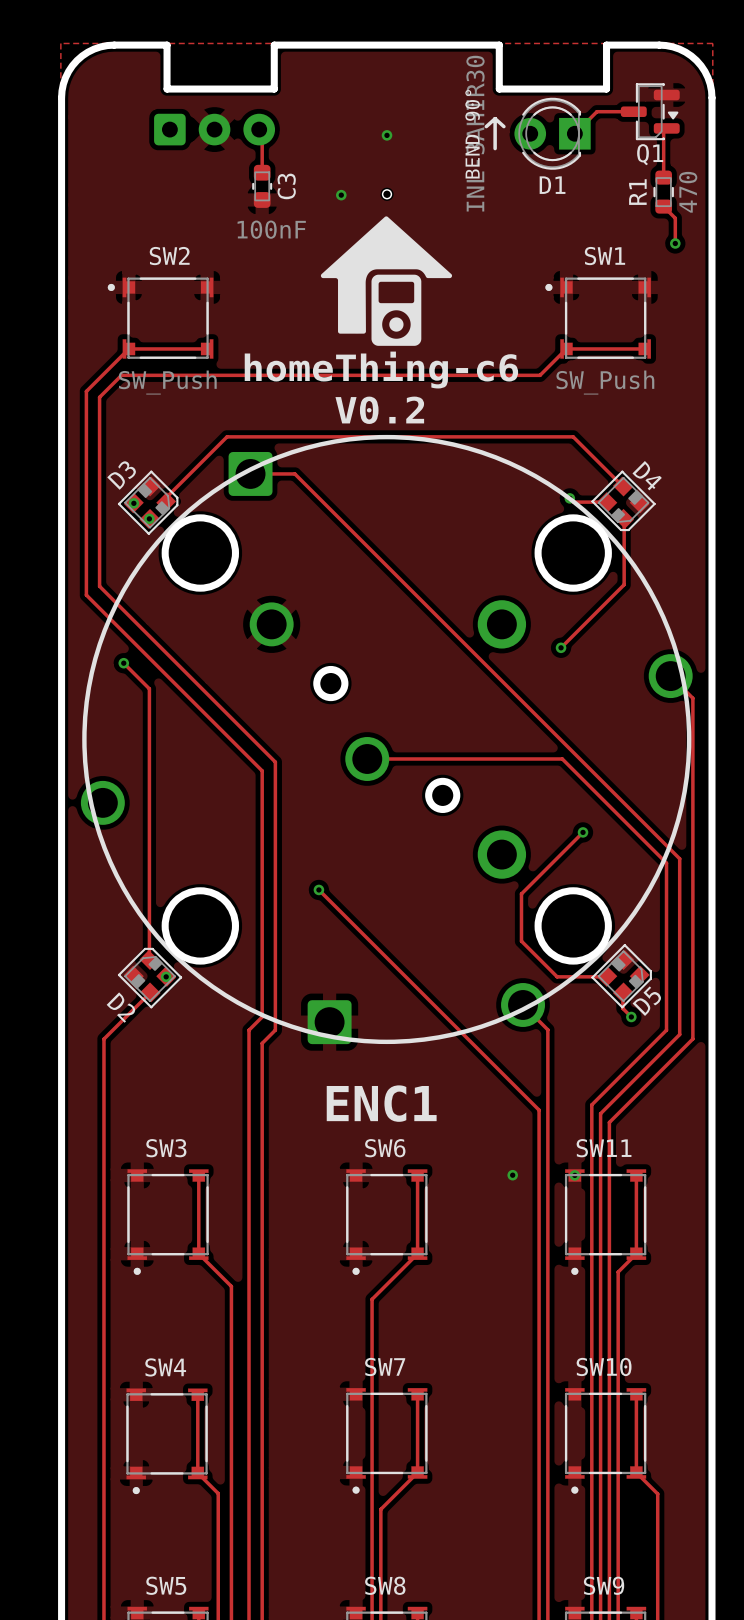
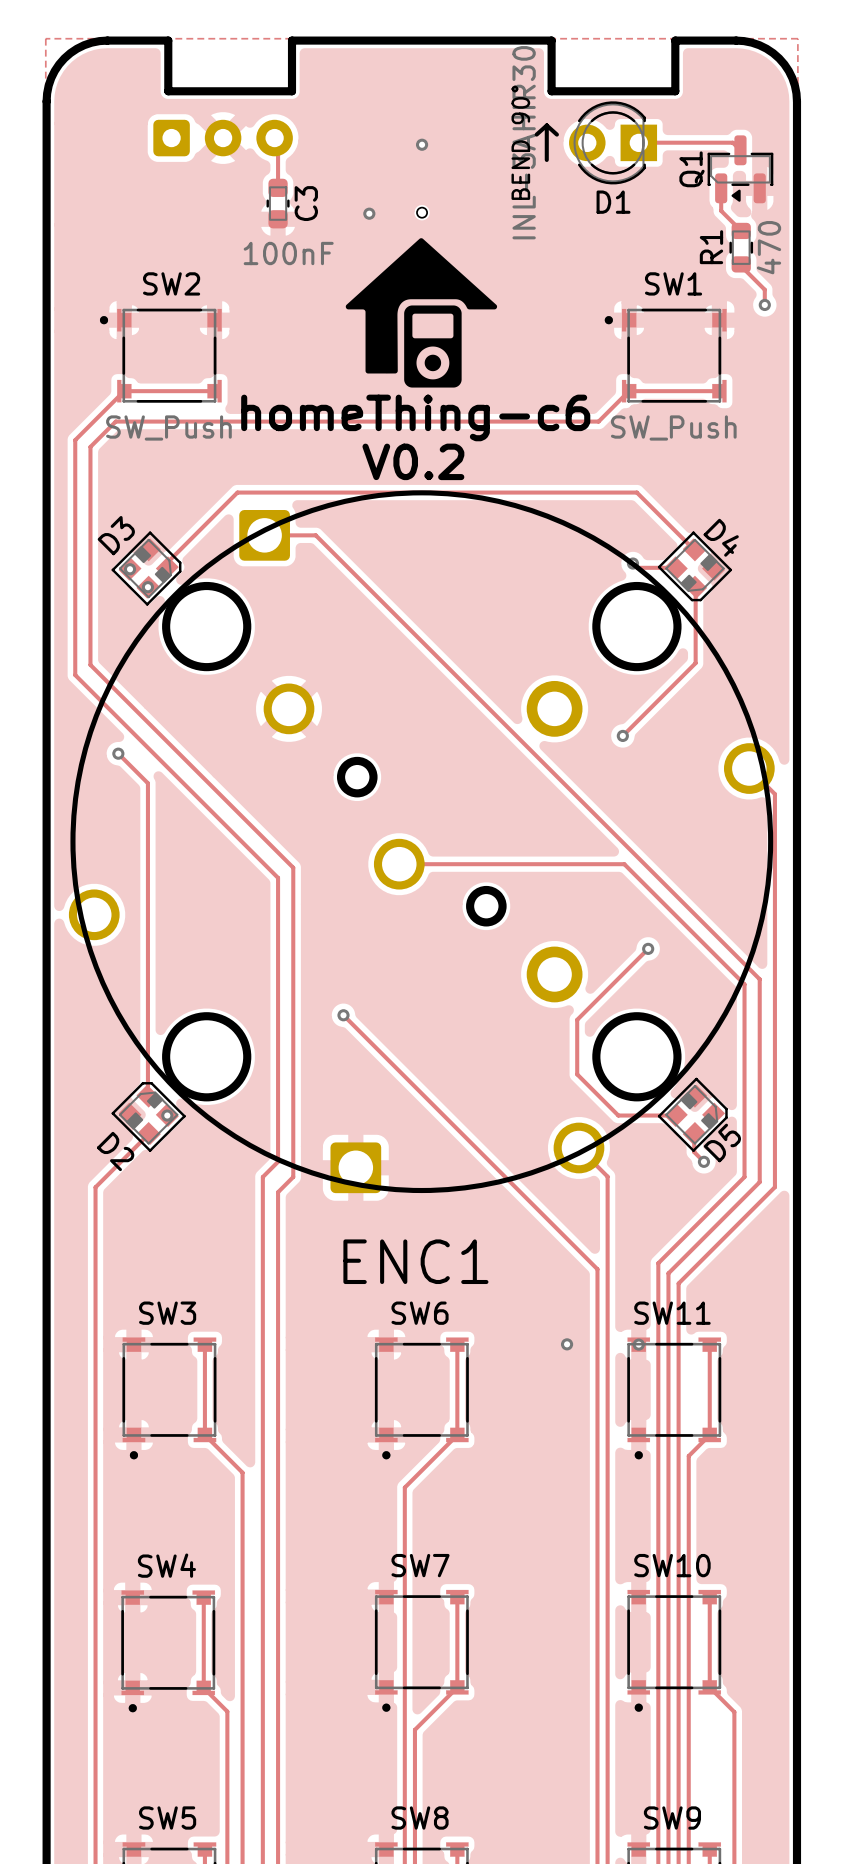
track: (633, 111) (596, 111) (575, 133) -> (740, 150) (732, 142) (638, 142)
Q1 rotation: 0° (650, 111) -> 90° clockwise (740, 169)
Q1 position: (650, 111) -> (740, 169)
track: (666, 128) (663, 131) (663, 177) -> none
track: none -> (721, 188) (721, 210) (741, 230)
R1 position: (663, 192) -> (741, 247)
track: (663, 206) (675, 218) (675, 243) -> none
track: none -> (741, 264) (764, 289) (764, 304)
via position: (675, 243) -> (764, 304)

